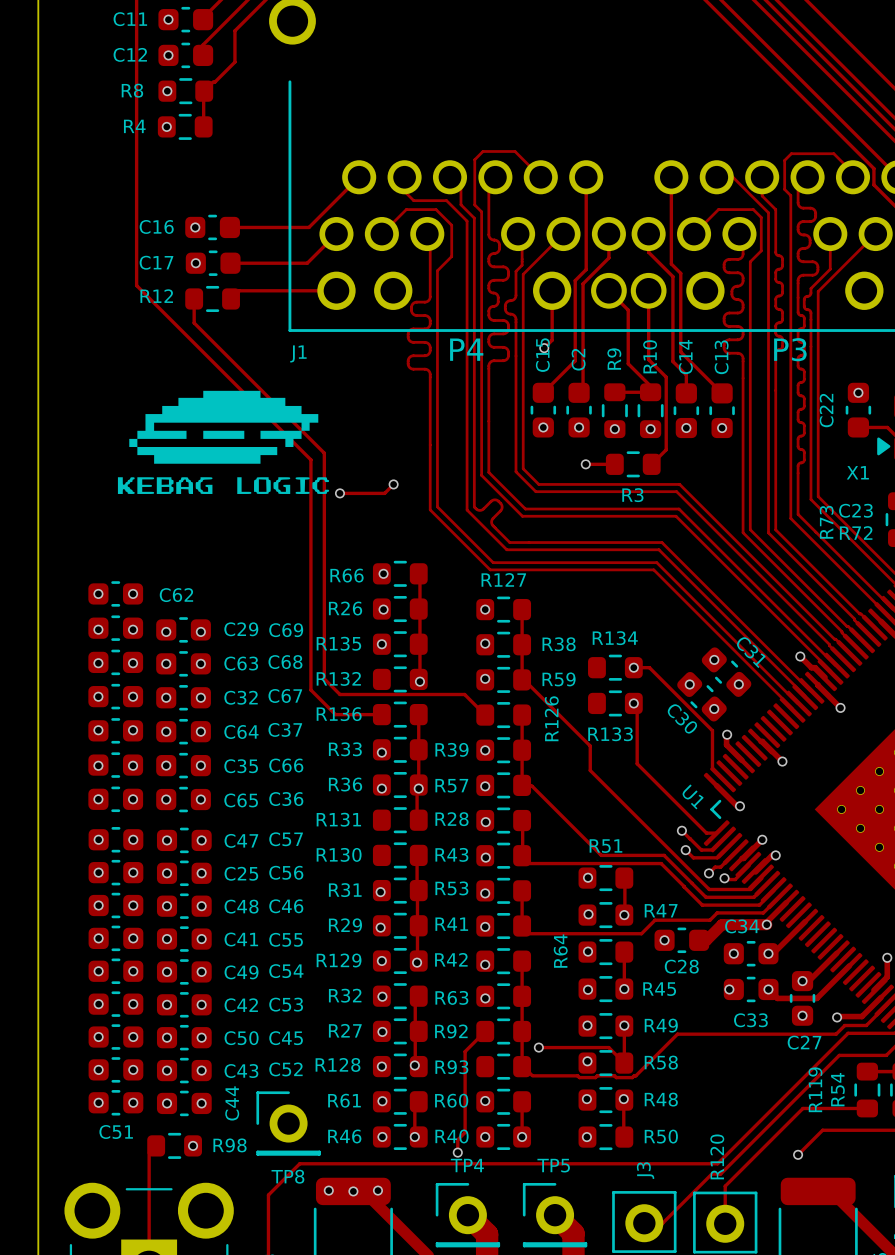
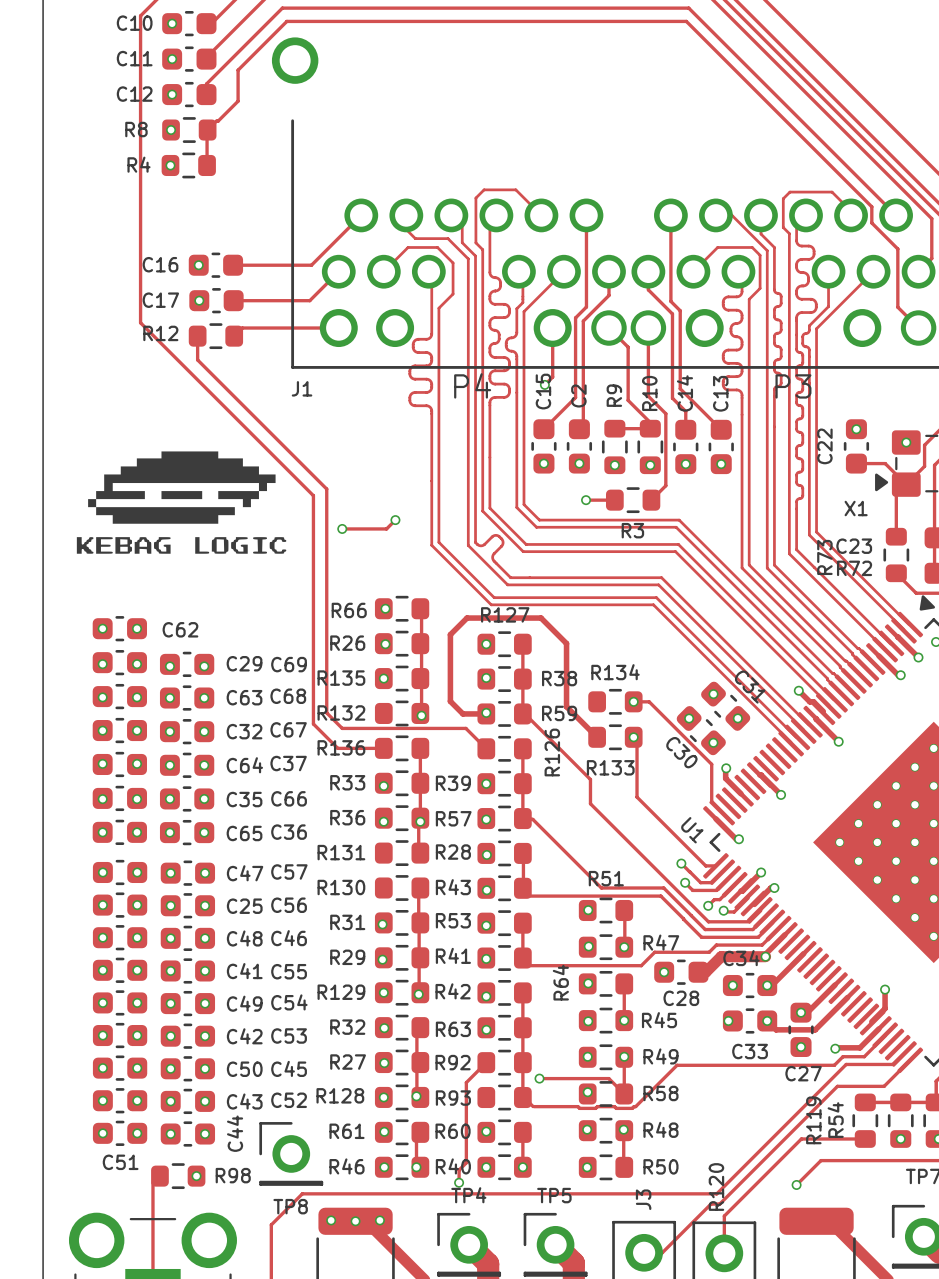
drawing position: (223, 442) -> (181, 502)
track: none -> (486, 713) (462, 713) (450, 701) (450, 634) (467, 618) (541, 618) (566, 643) (566, 706) (597, 737)

